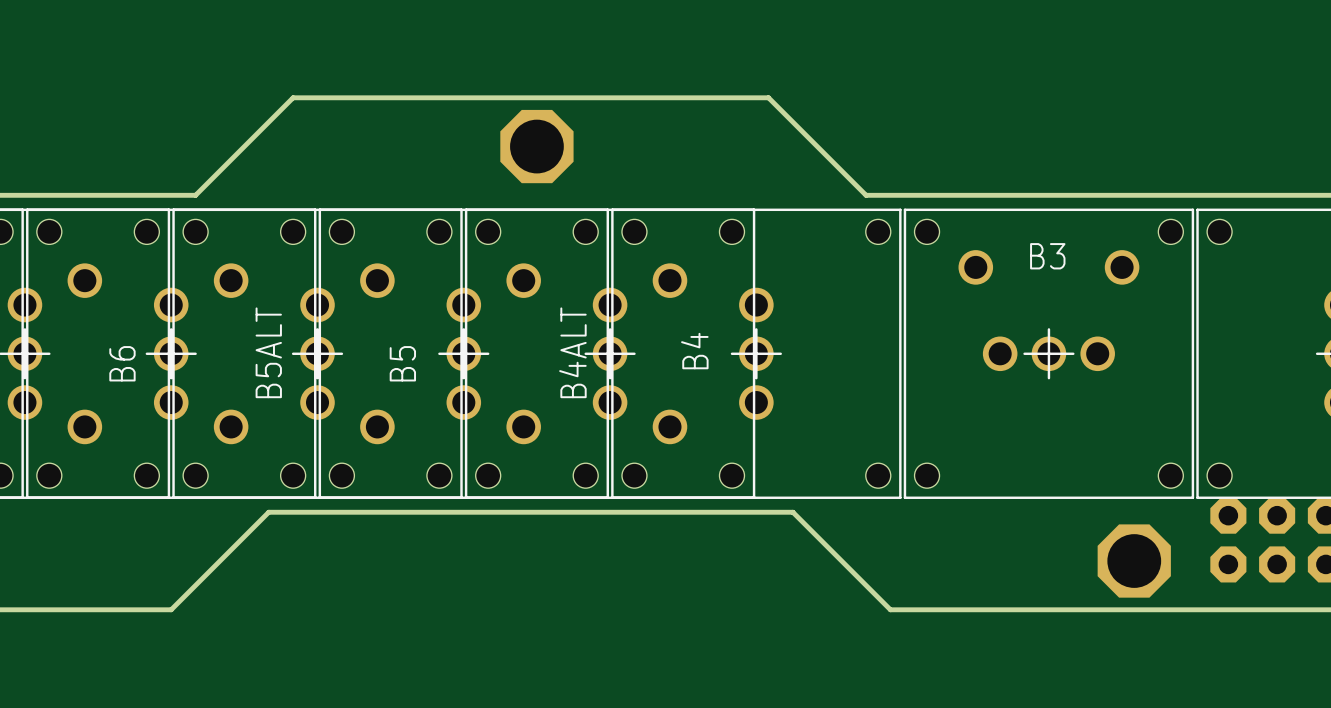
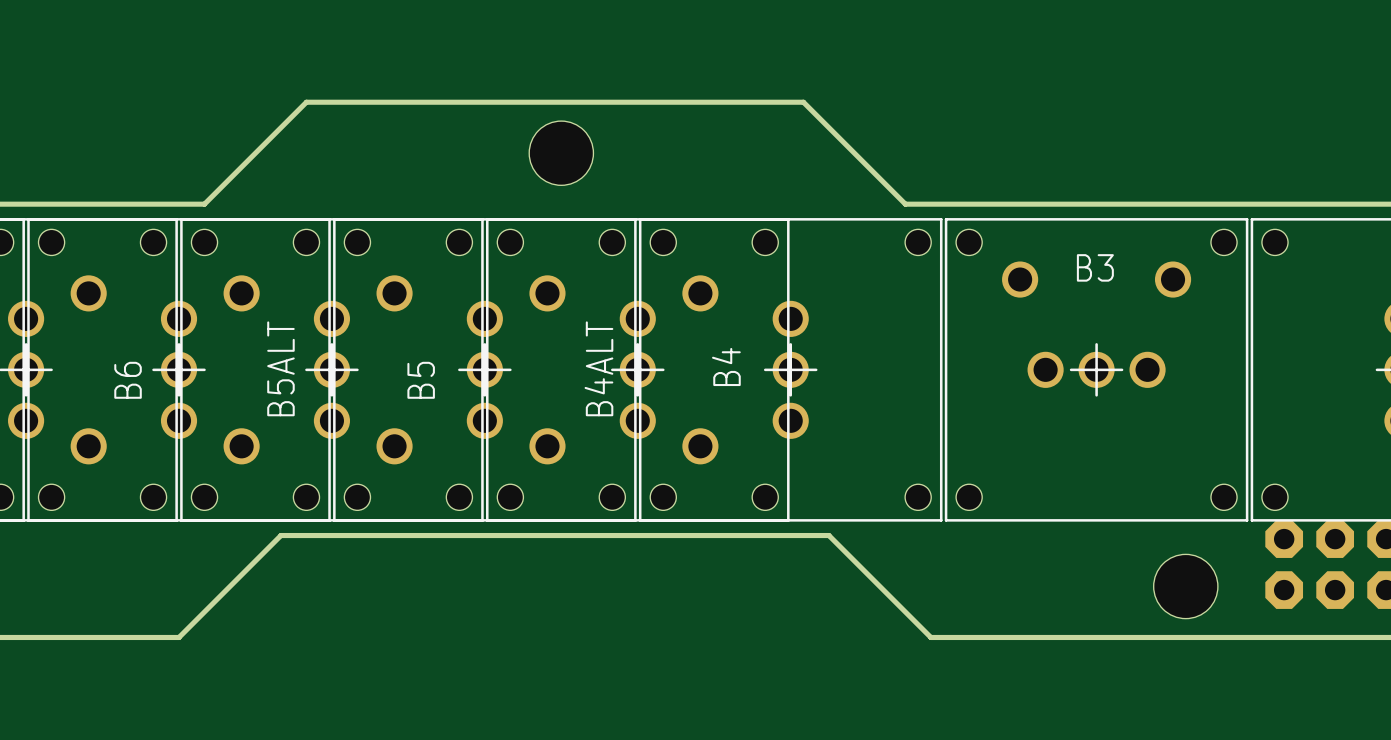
part: (536, 146) -> none
hole: none -> (561, 153)
part: (1134, 561) -> none
hole: none -> (1185, 586)

